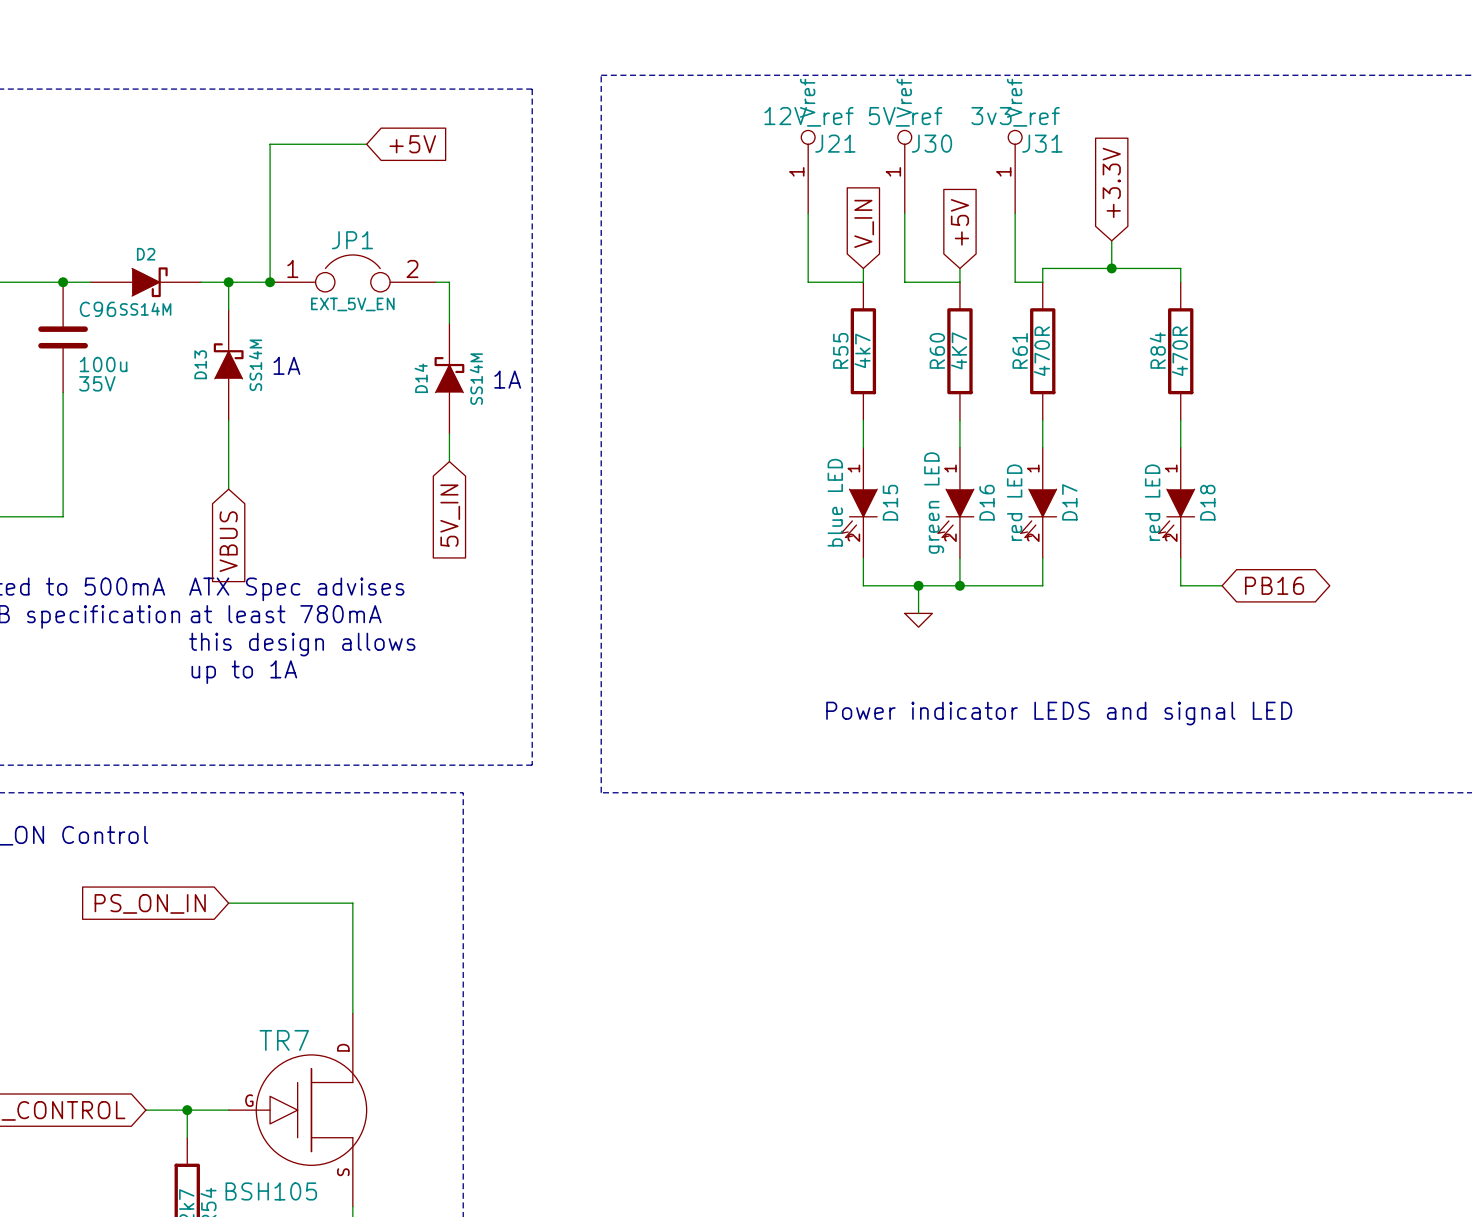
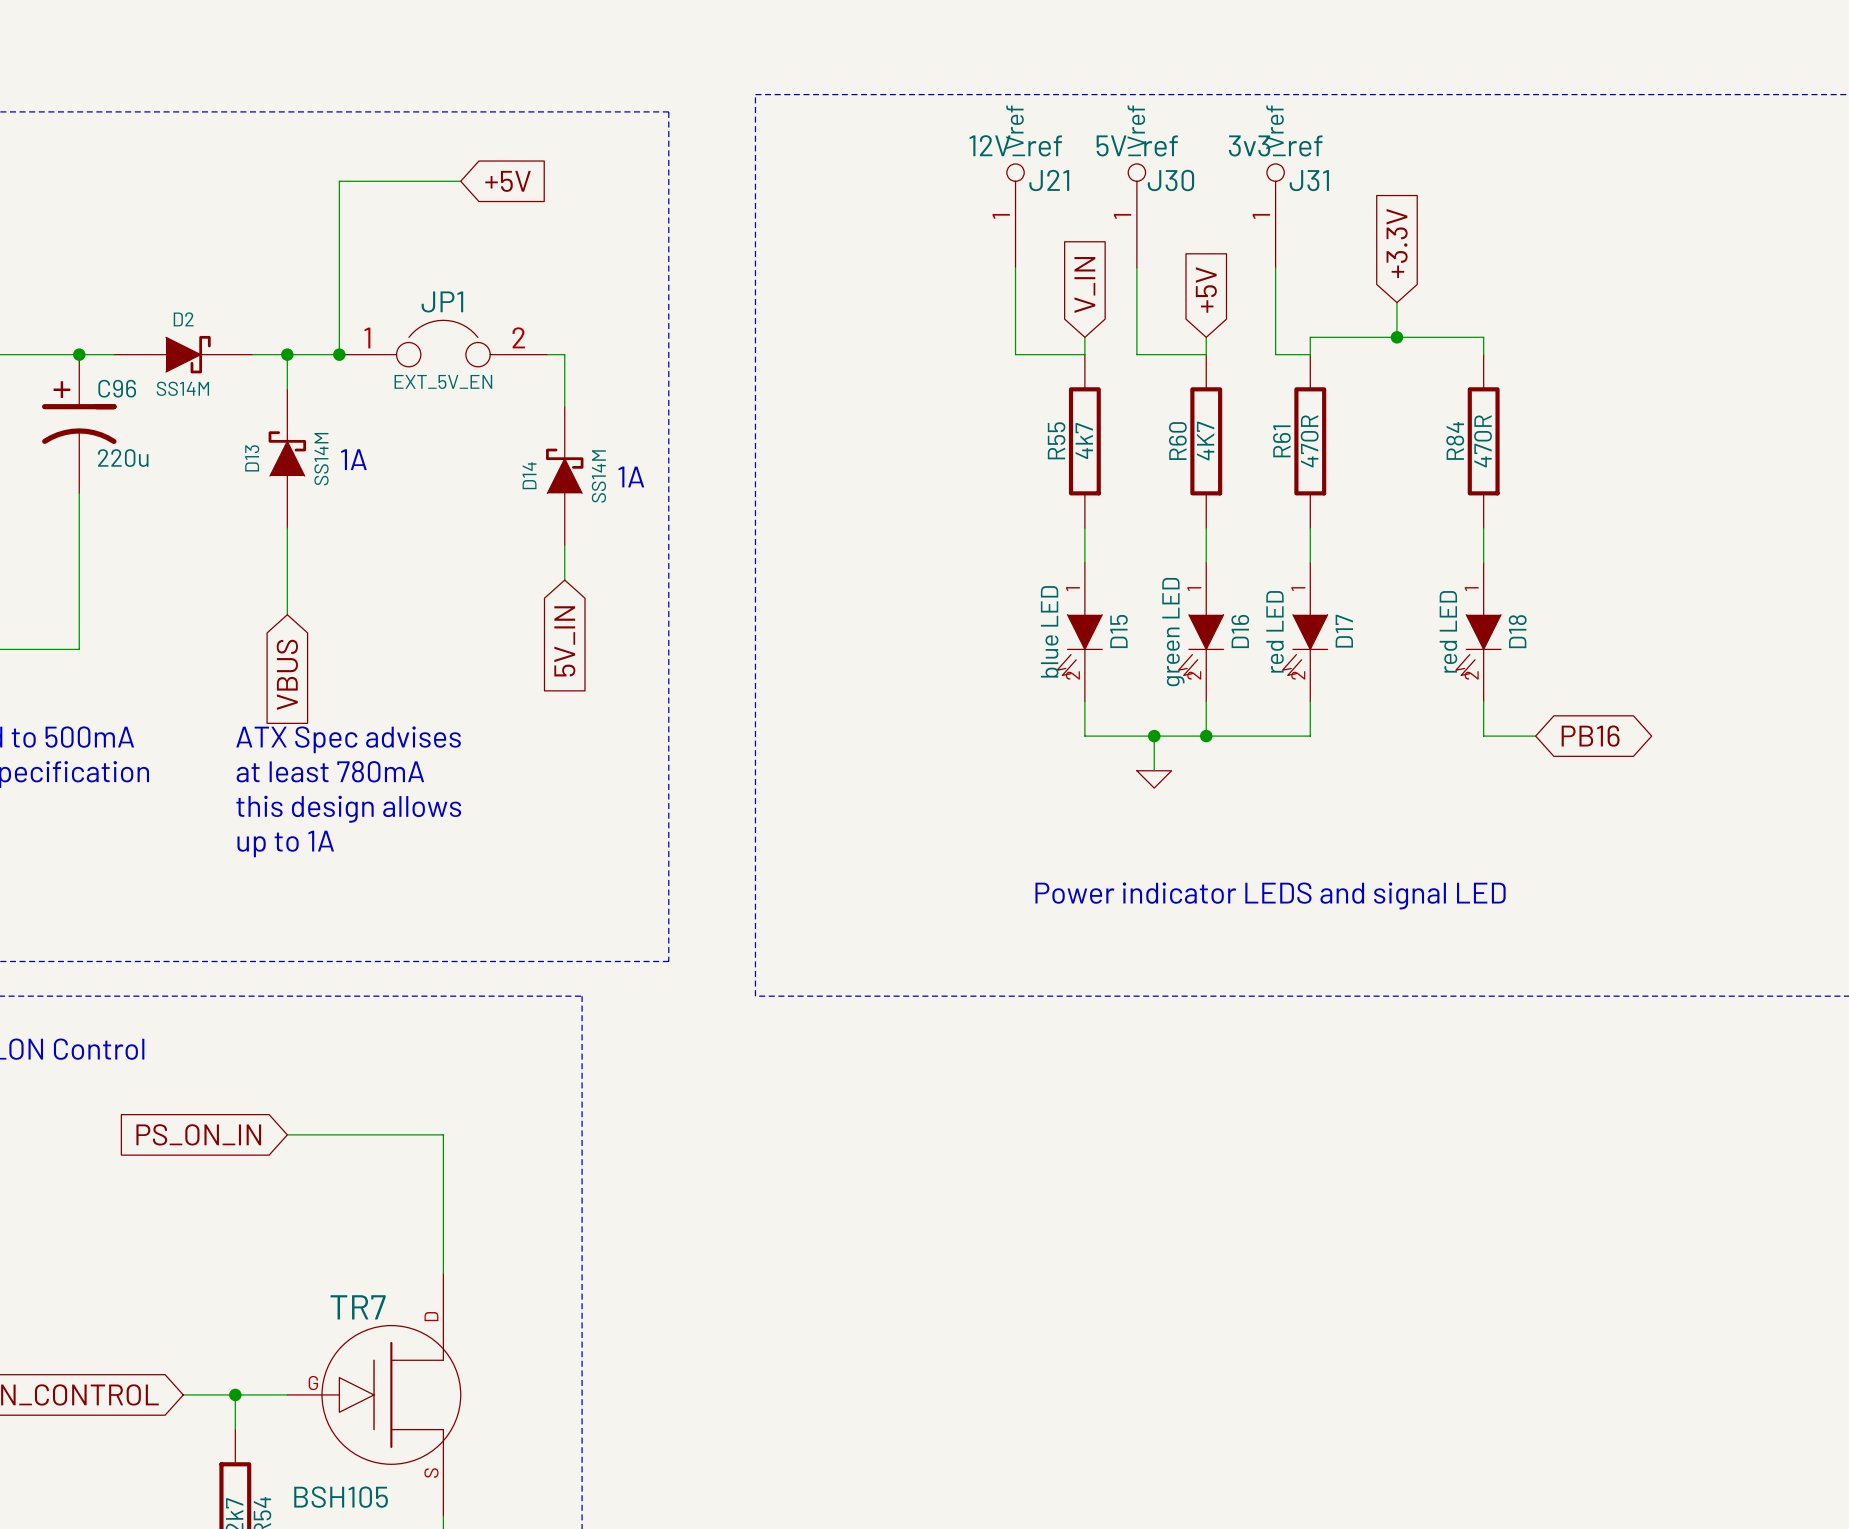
C96 symbol: [38, 282, 88, 393] -> [42, 354, 117, 494]
C96 value: 100u (103, 364) -> 220u (123, 458)
C96 text: 35V (97, 383) -> none

